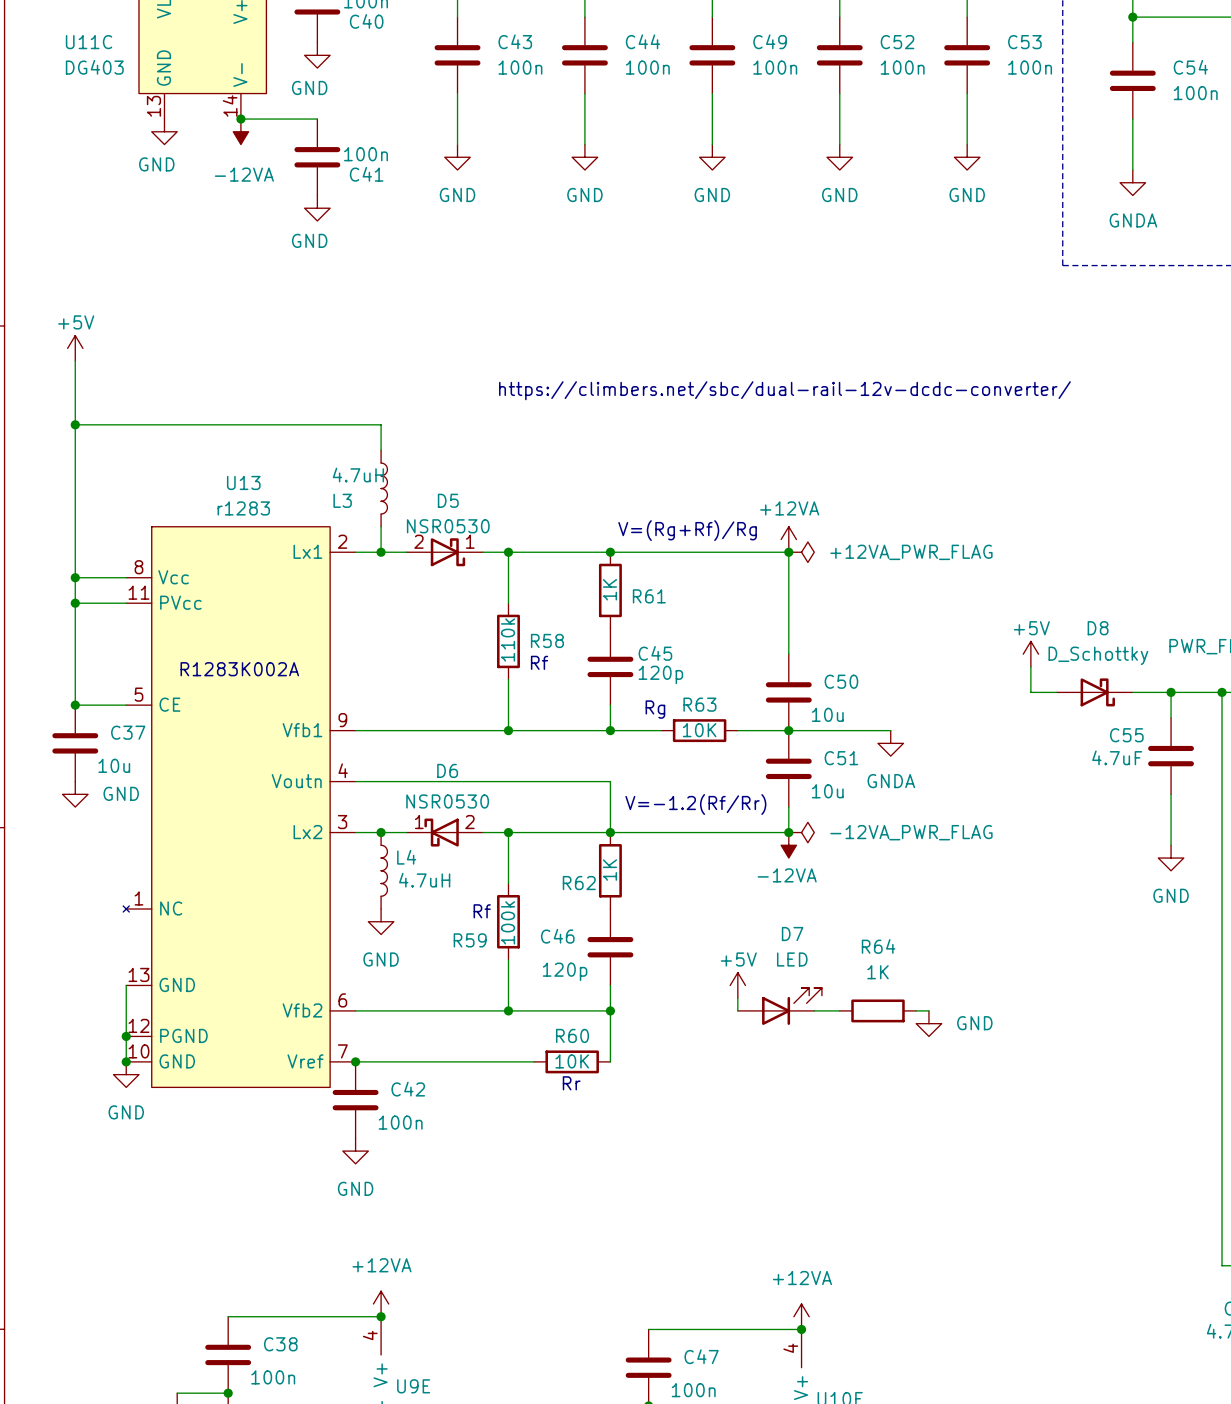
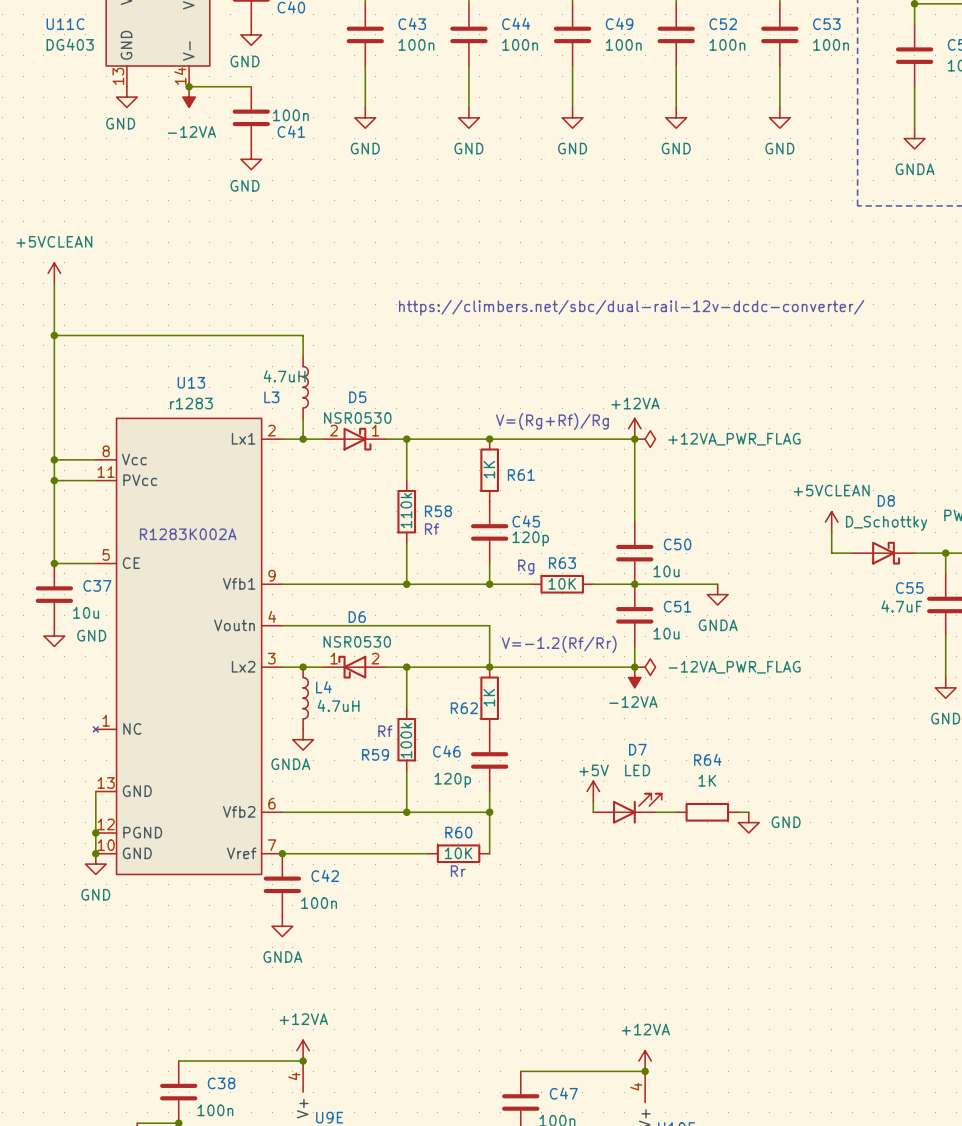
power symbol: +5V (75, 348) -> +5VCLEAN (54, 273)
power symbol: +5V (1030, 654) -> +5VCLEAN (831, 522)
power symbol: GND (381, 921) -> GNDA (303, 739)
power symbol: GND (355, 1151) -> GNDA (282, 926)

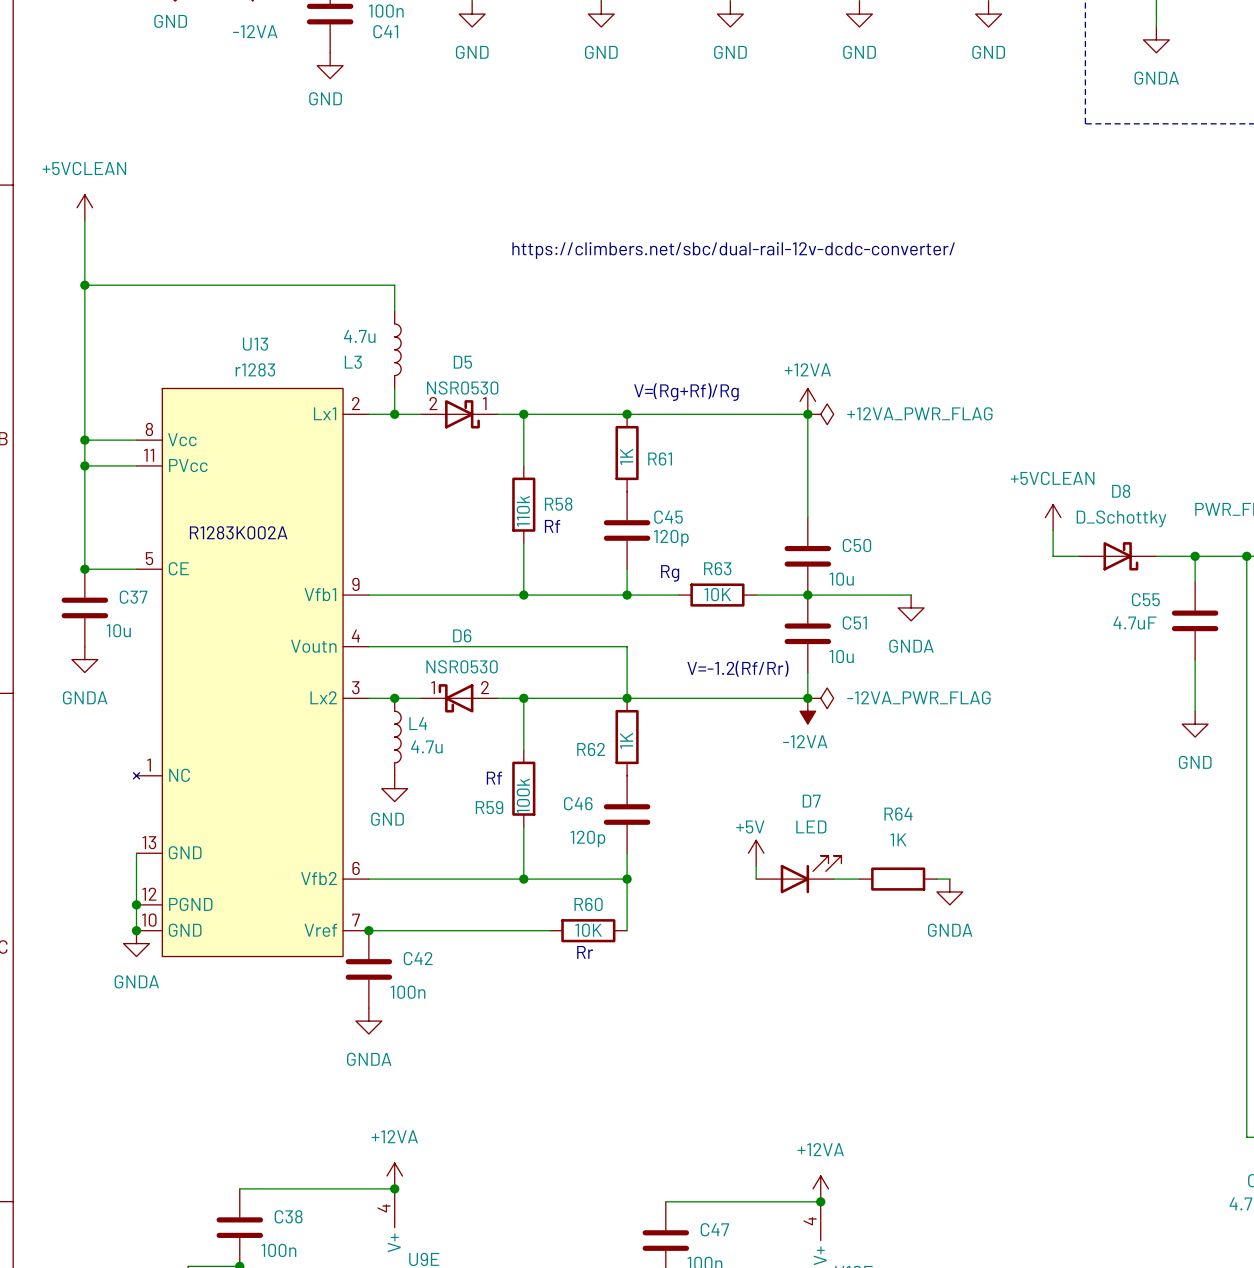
L3 value: 4.7uH (284, 376) -> 4.7u (359, 336)
power symbol: GND (54, 636) -> GNDA (84, 659)
L4 value: 4.7uH (338, 705) -> 4.7u (426, 746)
power symbol: GNDA (303, 739) -> GND (394, 788)
power symbol: GND (748, 822) -> GNDA (949, 891)
power symbol: GND (95, 864) -> GNDA (136, 943)

